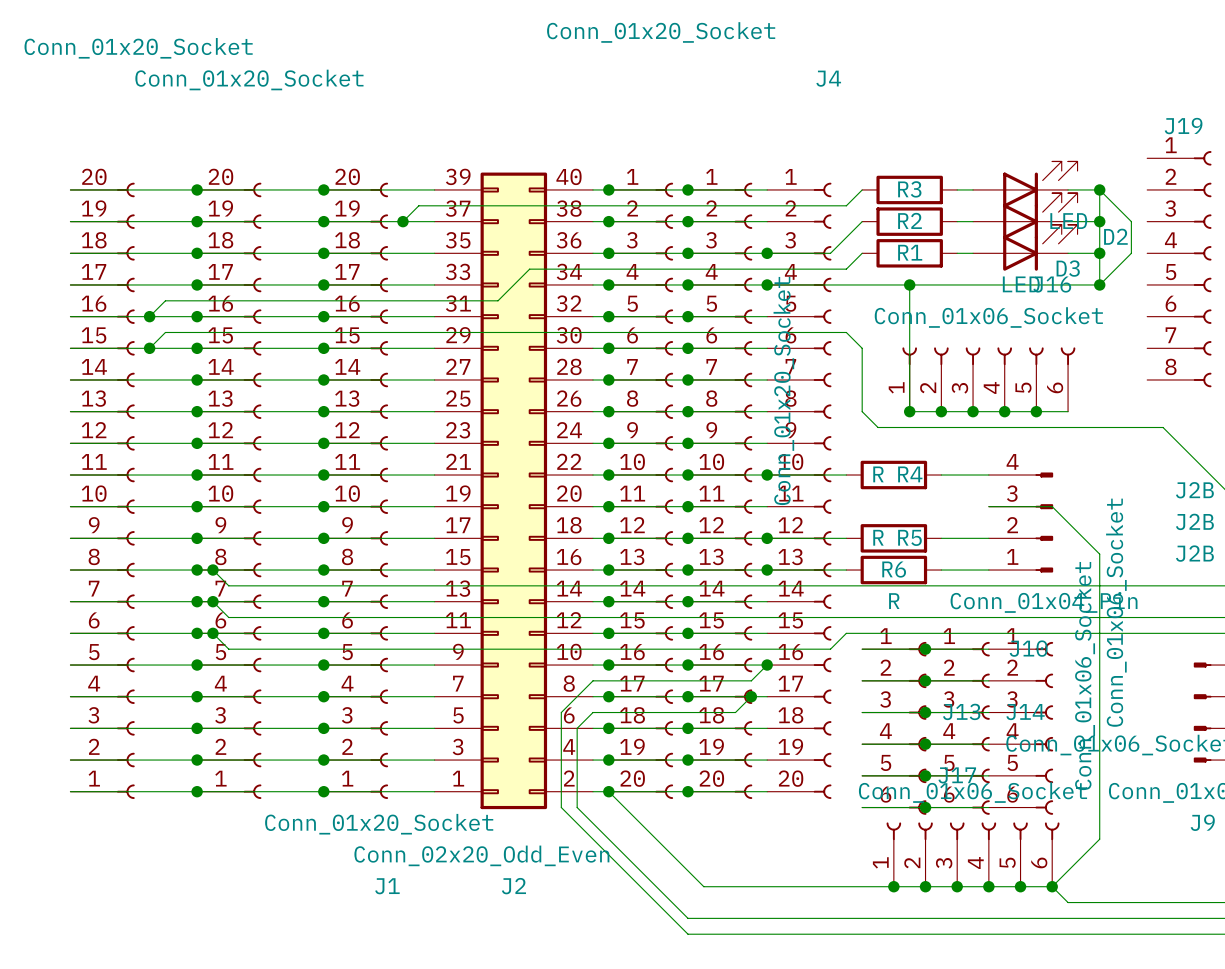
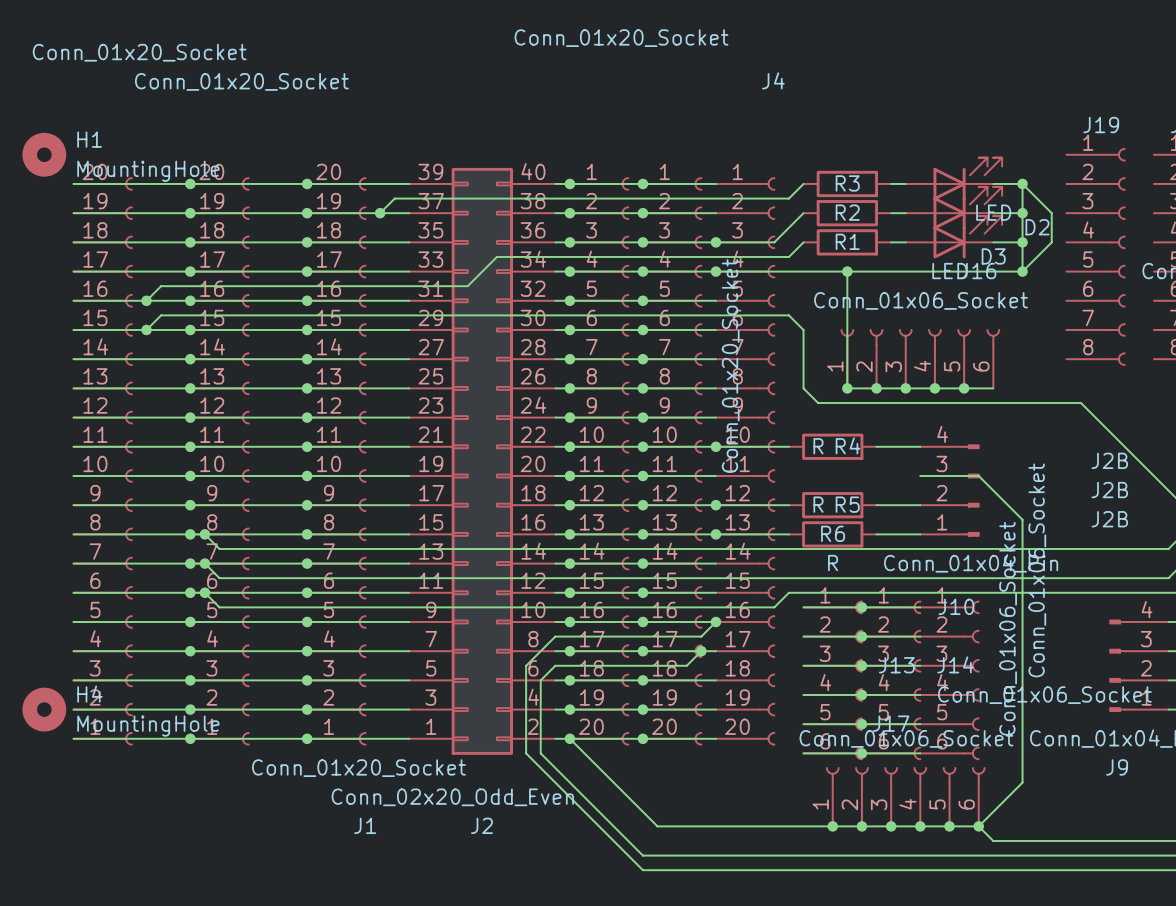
H1: none -> MountingHole (44, 154)
H4: none -> MountingHole (44, 709)

